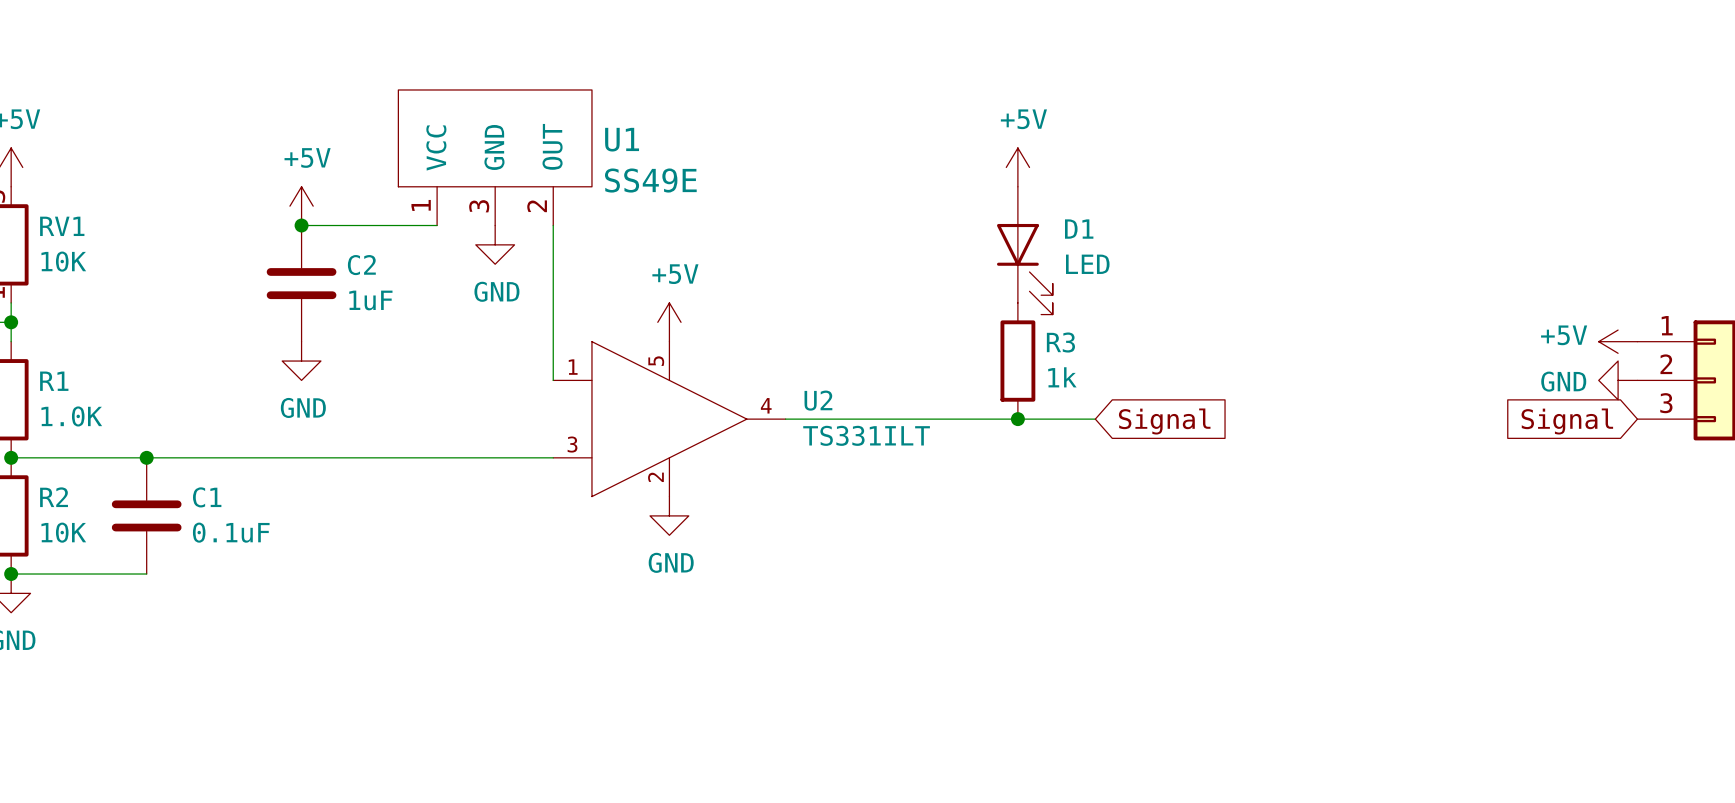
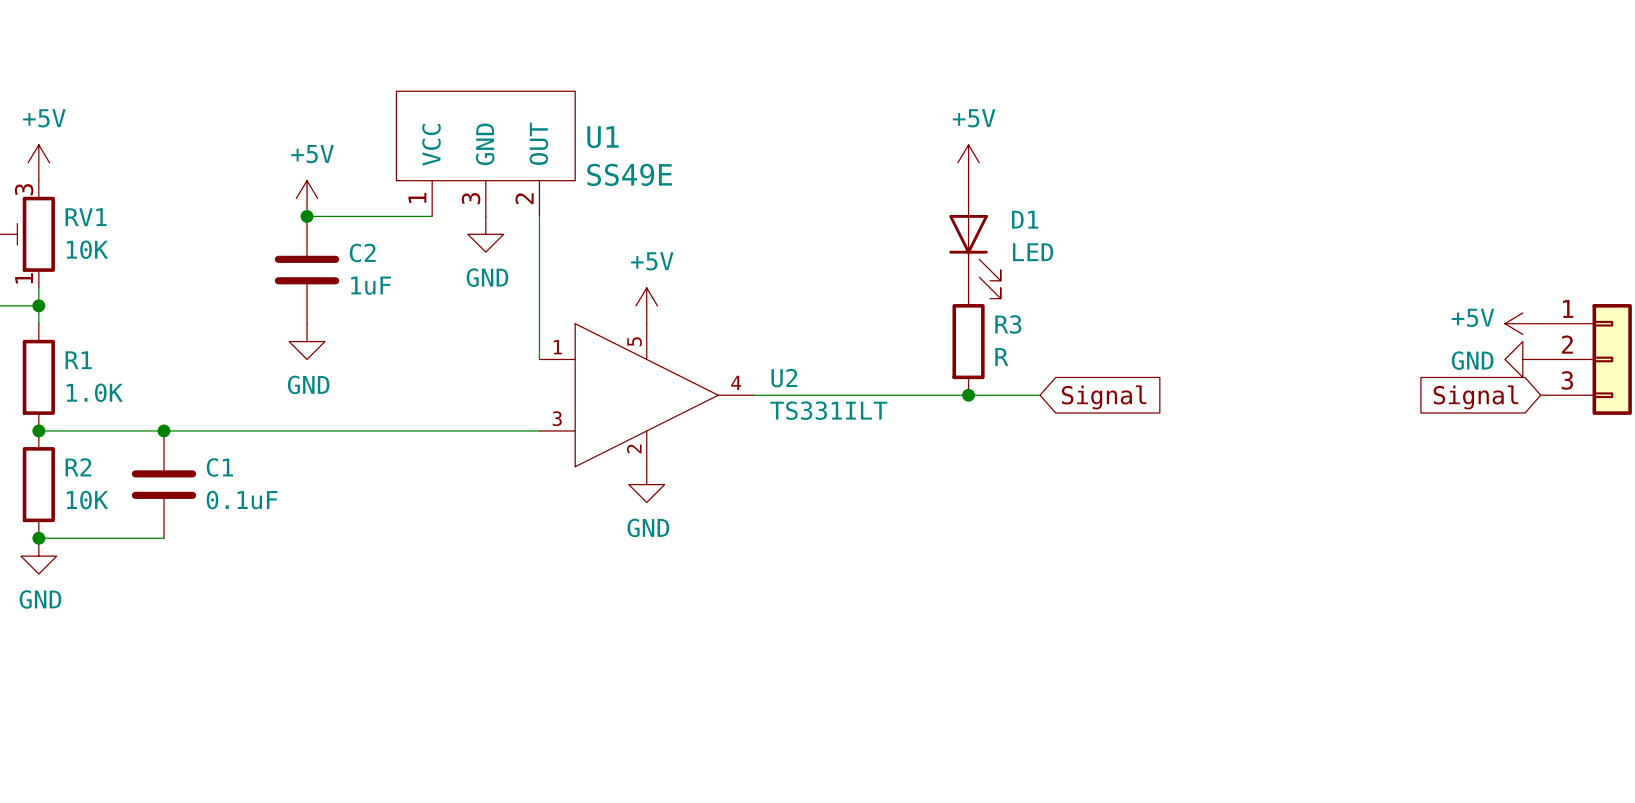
R3 value: 1k (1062, 377) -> R (1001, 357)

